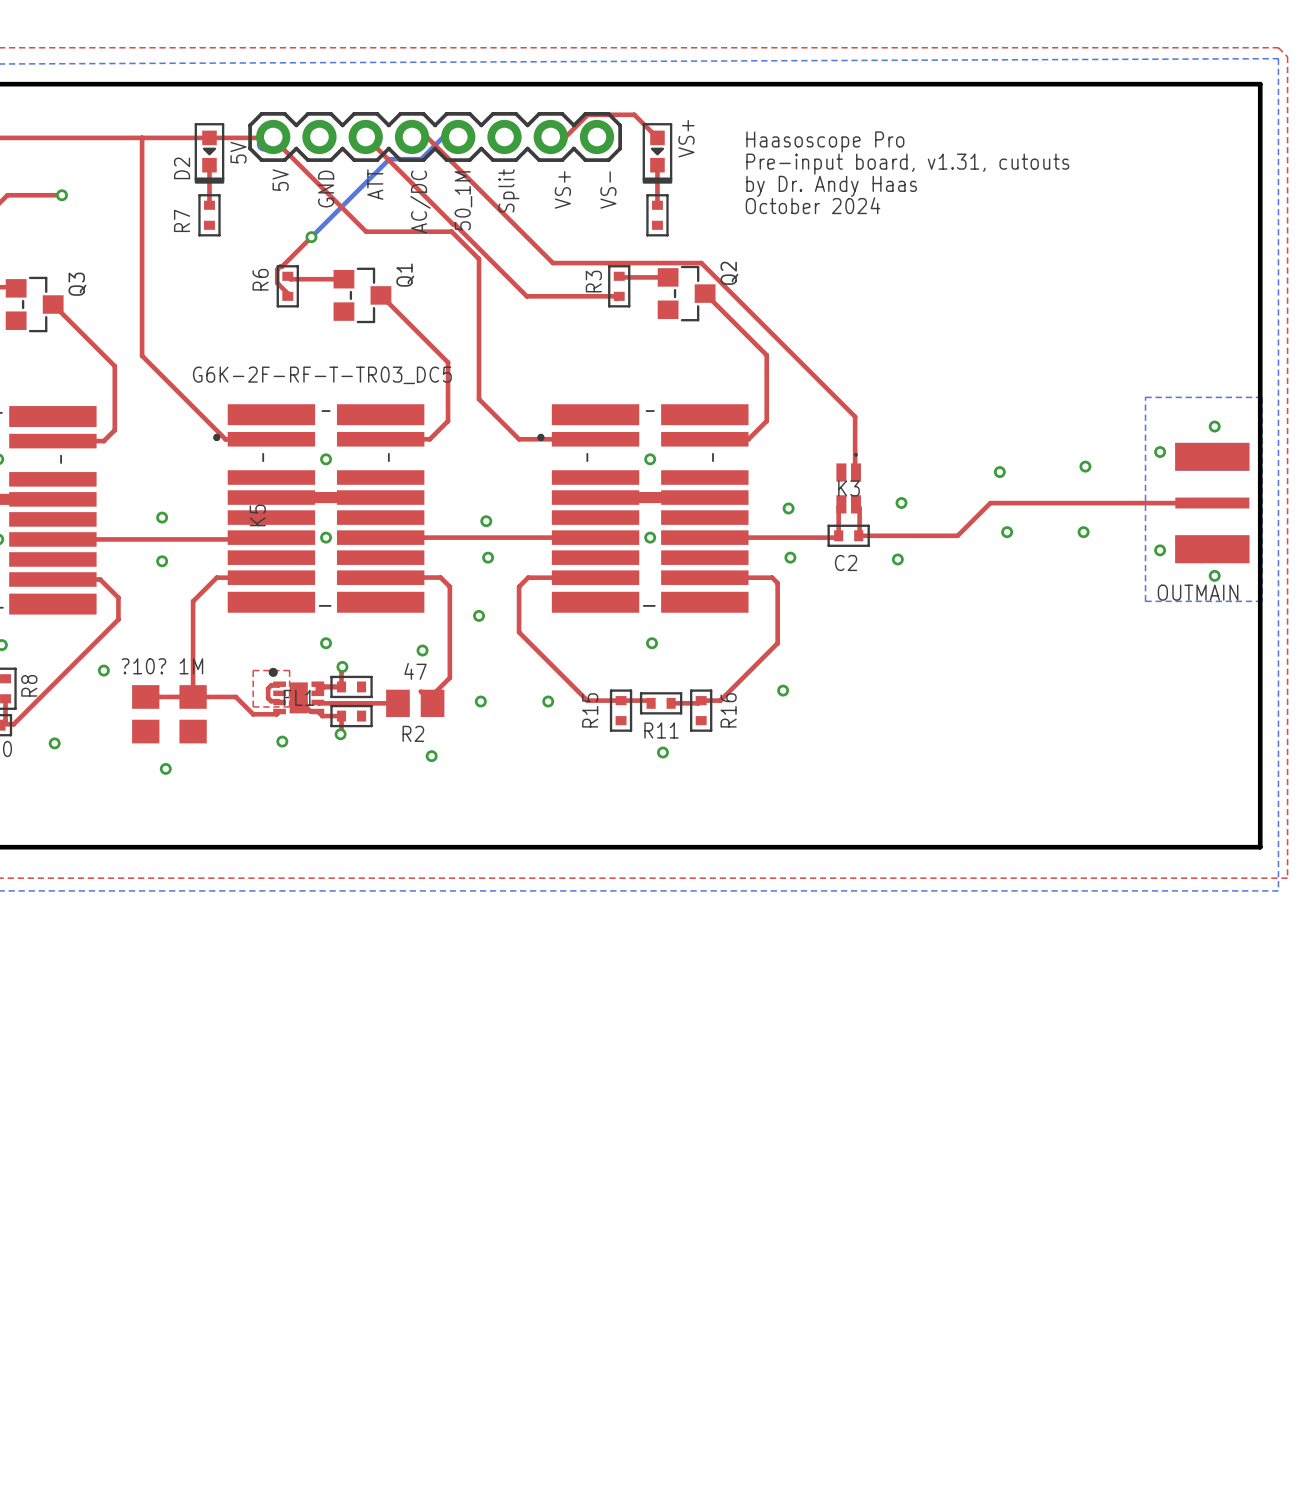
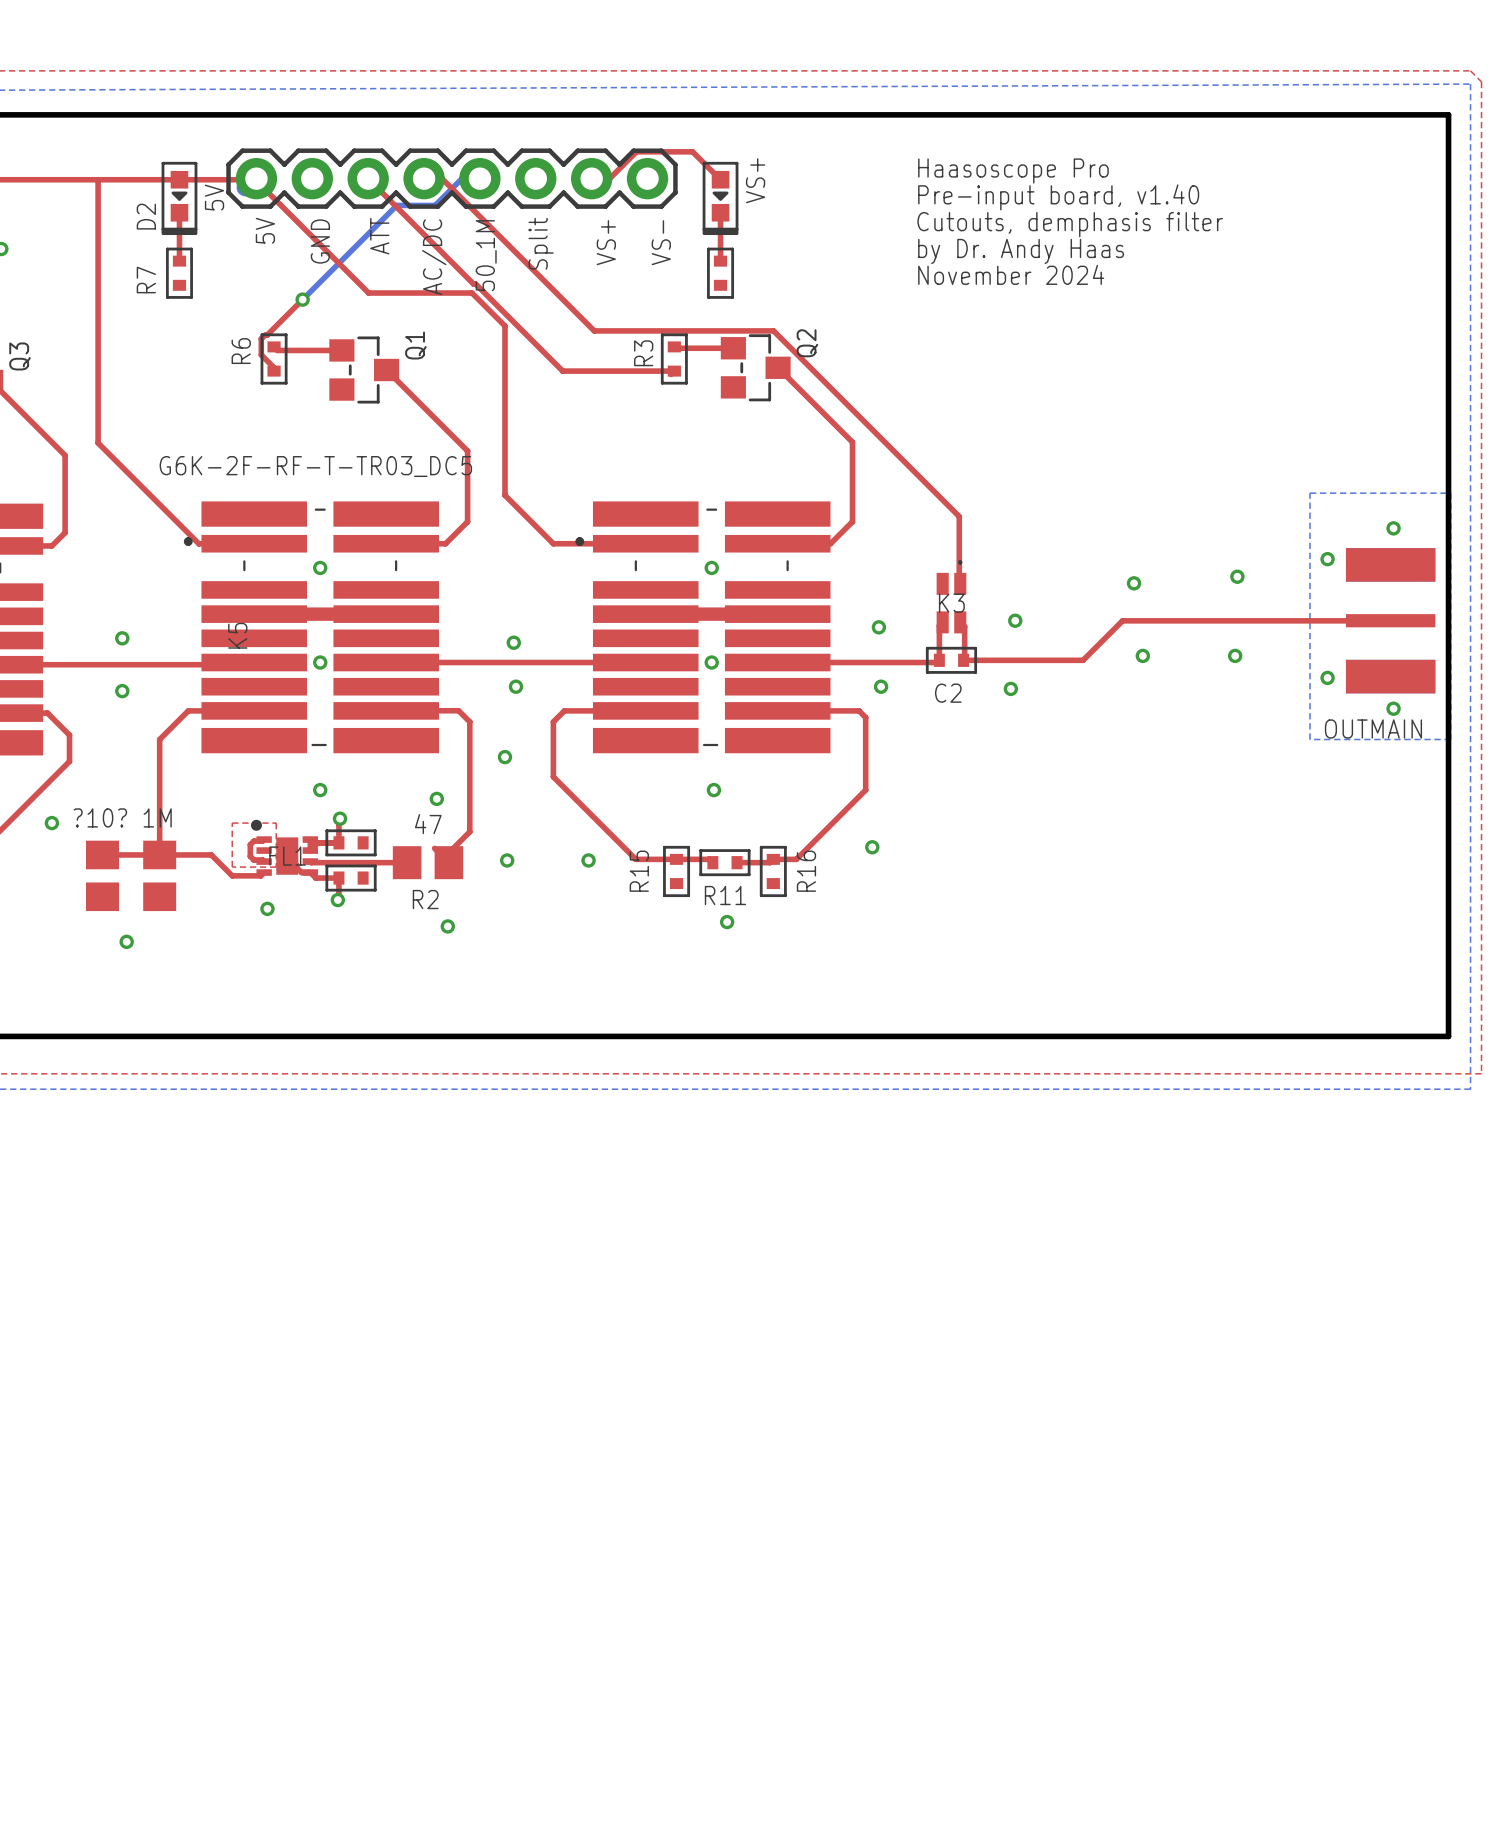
text position: Haasoscope Pro (825, 141) -> Haasoscope Pro (1013, 171)
text: Pre-input board, v1.31, cutouts (907, 164) -> Pre-input board, v1.40 (1058, 197)
text: none -> Cutouts, demphasis filter (1070, 224)
text position: by Dr. Andy Haas (831, 186) -> by Dr. Andy Haas (1021, 251)
text: October 2024 (812, 205) -> November 2024 (1011, 274)

